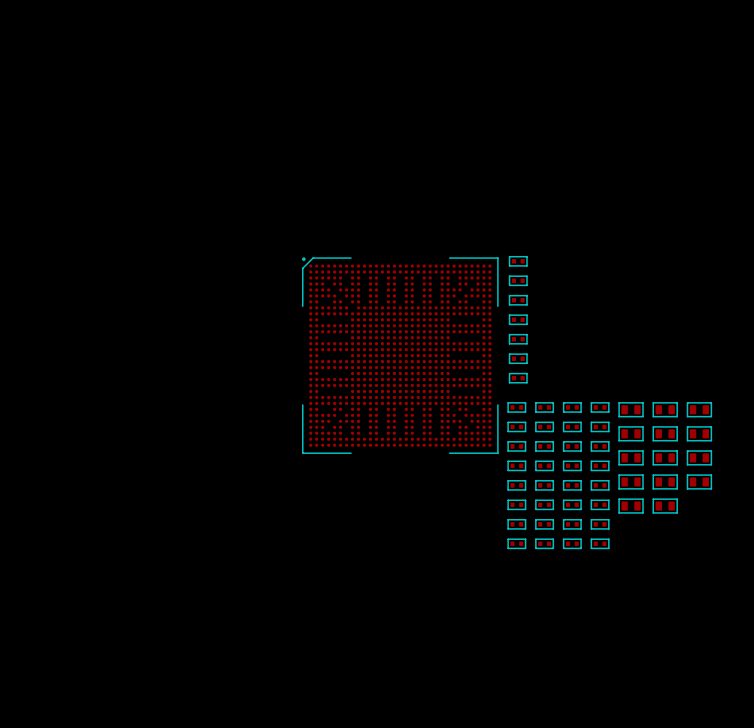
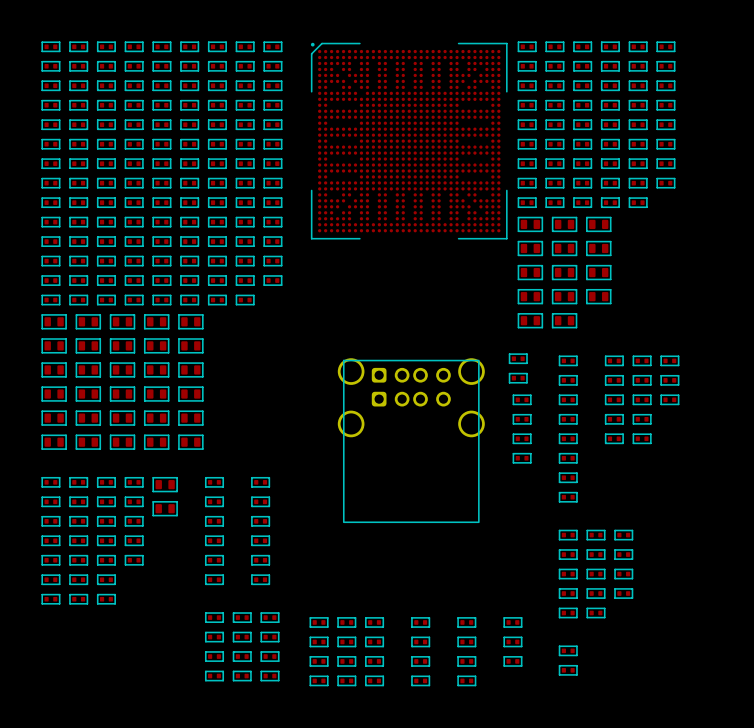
part: none -> (50, 46)
part: none -> (78, 46)
part: none -> (106, 46)
part: none -> (134, 46)
part: none -> (161, 46)
part: none -> (189, 46)
part: none -> (217, 46)
part: none -> (245, 46)
part: none -> (272, 46)
part: none -> (527, 46)
part: none -> (554, 46)
part: none -> (582, 46)
part: none -> (610, 46)
part: none -> (638, 46)
part: none -> (665, 46)
part: none -> (50, 66)
part: none -> (78, 66)
part: none -> (106, 66)
part: none -> (134, 66)
part: none -> (161, 66)
part: none -> (189, 66)
part: none -> (217, 66)
part: none -> (245, 66)
part: none -> (272, 66)
part: none -> (527, 66)
part: none -> (554, 66)
part: none -> (582, 66)
part: none -> (610, 66)
part: none -> (638, 66)
part: none -> (665, 66)
part: none -> (50, 85)
part: none -> (78, 85)
part: none -> (106, 85)
part: none -> (134, 85)
part: none -> (161, 85)
part: none -> (189, 85)
part: none -> (217, 85)
part: none -> (245, 85)
part: none -> (272, 85)
part: none -> (527, 85)
part: none -> (554, 85)
part: none -> (582, 85)
part: none -> (610, 85)
part: none -> (638, 85)
part: none -> (665, 85)
part: none -> (50, 105)
part: none -> (78, 105)
part: none -> (106, 105)
part: none -> (134, 105)
part: none -> (161, 105)
part: none -> (189, 105)
part: none -> (217, 105)
part: none -> (245, 105)
part: none -> (272, 105)
part: none -> (527, 105)
part: none -> (554, 105)
part: none -> (582, 105)
part: none -> (610, 105)
part: none -> (638, 105)
part: none -> (665, 105)
part: none -> (50, 124)
part: none -> (78, 124)
part: none -> (106, 124)
part: none -> (134, 124)
part: none -> (161, 124)
part: none -> (189, 124)
part: none -> (217, 124)
part: none -> (245, 124)
part: none -> (272, 124)
part: none -> (527, 124)
part: none -> (554, 124)
part: none -> (582, 124)
part: none -> (610, 124)
part: none -> (638, 124)
part: none -> (665, 124)
part: none -> (50, 144)
part: none -> (78, 144)
part: none -> (106, 144)
part: none -> (134, 144)
part: none -> (161, 144)
part: none -> (189, 144)
part: none -> (217, 144)
part: none -> (245, 144)
part: none -> (272, 144)
part: none -> (527, 144)
part: none -> (554, 144)
part: none -> (582, 144)
part: none -> (610, 144)
part: none -> (638, 144)
part: none -> (665, 144)
part: none -> (50, 163)
part: none -> (78, 163)
part: none -> (106, 163)
part: none -> (134, 163)
part: none -> (161, 163)
part: none -> (189, 163)
part: none -> (217, 163)
part: none -> (245, 163)
part: none -> (272, 163)
part: none -> (527, 163)
part: none -> (554, 163)
part: none -> (582, 163)
part: none -> (610, 163)
part: none -> (638, 163)
part: none -> (665, 163)
part: none -> (50, 183)
part: none -> (78, 183)
part: none -> (106, 183)
part: none -> (134, 183)
part: none -> (161, 183)
part: none -> (189, 183)
part: none -> (217, 183)
part: none -> (245, 183)
part: none -> (272, 183)
part: none -> (527, 183)
part: none -> (554, 183)
part: none -> (582, 183)
part: none -> (610, 183)
part: none -> (638, 183)
part: none -> (665, 183)
part: none -> (50, 202)
part: none -> (78, 202)
part: none -> (106, 202)
part: none -> (134, 202)
part: none -> (161, 202)
part: none -> (189, 202)
part: none -> (217, 202)
part: none -> (245, 202)
part: none -> (272, 202)
part: none -> (527, 202)
part: none -> (554, 202)
part: none -> (582, 202)
part: none -> (610, 202)
part: none -> (638, 202)
part: none -> (50, 222)
part: none -> (78, 222)
part: none -> (106, 222)
part: none -> (134, 222)
part: none -> (161, 222)
part: none -> (189, 222)
part: none -> (217, 222)
part: none -> (245, 222)
part: none -> (272, 222)
part: none -> (530, 224)
part: none -> (564, 224)
part: none -> (598, 224)
part: none -> (50, 241)
part: none -> (78, 241)
part: none -> (106, 241)
part: none -> (134, 241)
part: none -> (161, 241)
part: none -> (189, 241)
part: none -> (217, 241)
part: none -> (245, 241)
part: none -> (272, 241)
part: none -> (530, 248)
part: none -> (564, 248)
part: none -> (598, 248)
part: none -> (50, 261)
part: none -> (78, 261)
part: none -> (106, 261)
part: none -> (134, 261)
part: none -> (161, 261)
part: none -> (189, 261)
part: none -> (217, 261)
part: none -> (245, 261)
part: none -> (272, 261)
part: (518, 261) -> none
part: none -> (530, 272)
part: none -> (564, 272)
part: none -> (598, 272)
part: none -> (50, 280)
part: none -> (78, 280)
part: none -> (106, 280)
part: none -> (134, 280)
part: none -> (161, 280)
part: none -> (189, 280)
part: none -> (217, 280)
part: none -> (245, 280)
part: none -> (272, 280)
part: (518, 280) -> none
part: none -> (530, 296)
part: none -> (564, 296)
part: none -> (598, 296)
part: none -> (50, 300)
part: none -> (78, 300)
part: none -> (106, 300)
part: none -> (134, 300)
part: none -> (161, 300)
part: none -> (189, 300)
part: none -> (217, 300)
part: none -> (245, 300)
part: (518, 300) -> none
part: (518, 319) -> none
part: none -> (530, 320)
part: none -> (564, 320)
part: none -> (54, 321)
part: none -> (88, 321)
part: none -> (122, 321)
part: none -> (156, 321)
part: none -> (190, 321)
part: (518, 339) -> none
part: none -> (54, 345)
part: none -> (88, 345)
part: none -> (122, 345)
part: none -> (156, 345)
part: none -> (190, 345)
part position: (400, 355) -> (409, 141)
part: none -> (568, 360)
part: none -> (614, 360)
part: none -> (642, 360)
part: none -> (669, 360)
part: none -> (54, 369)
part: none -> (88, 369)
part: none -> (122, 369)
part: none -> (156, 369)
part: none -> (190, 369)
part: none -> (568, 380)
part: none -> (614, 380)
part: none -> (642, 380)
part: none -> (669, 380)
part: none -> (54, 394)
part: none -> (88, 394)
part: none -> (122, 394)
part: none -> (156, 394)
part: none -> (190, 394)
part: none -> (522, 399)
part: none -> (568, 399)
part: none -> (614, 399)
part: none -> (642, 399)
part: none -> (669, 399)
part: (516, 407) -> none
part: (544, 407) -> none
part: (572, 407) -> none
part: (600, 407) -> none
part: (631, 409) -> none
part: (665, 409) -> none
part: (699, 409) -> none
part: none -> (54, 418)
part: none -> (88, 418)
part: none -> (122, 418)
part: none -> (156, 418)
part: none -> (190, 418)
part: none -> (522, 419)
part: none -> (568, 419)
part: none -> (614, 419)
part: none -> (642, 419)
part: (516, 426) -> none
part: (544, 426) -> none
part: (572, 426) -> none
part: (600, 426) -> none
part: (631, 433) -> none
part: (665, 433) -> none
part: (699, 433) -> none
part: none -> (522, 438)
part: none -> (568, 438)
part: none -> (614, 438)
part: none -> (642, 438)
part: none -> (411, 440)
part: none -> (54, 442)
part: none -> (88, 442)
part: none -> (122, 442)
part: none -> (156, 442)
part: none -> (190, 442)
part: (516, 446) -> none
part: (544, 446) -> none
part: (572, 446) -> none
part: (600, 446) -> none
part: (631, 457) -> none
part: (665, 457) -> none
part: (699, 457) -> none
part: none -> (522, 458)
part: none -> (568, 458)
part: (516, 465) -> none
part: (544, 465) -> none
part: (572, 465) -> none
part: (600, 465) -> none
part: none -> (568, 477)
part: (631, 481) -> none
part: (665, 481) -> none
part: (699, 481) -> none
part: none -> (50, 482)
part: none -> (78, 482)
part: none -> (106, 482)
part: none -> (134, 482)
part: none -> (214, 482)
part: none -> (260, 482)
part: none -> (165, 484)
part: (516, 485) -> none
part: (544, 485) -> none
part: (572, 485) -> none
part: (600, 485) -> none
part: none -> (568, 497)
part: none -> (50, 501)
part: none -> (78, 501)
part: none -> (106, 501)
part: none -> (134, 501)
part: none -> (214, 501)
part: none -> (260, 501)
part: (516, 504) -> none
part: (544, 504) -> none
part: (572, 504) -> none
part: (600, 504) -> none
part: (631, 506) -> none
part: (665, 506) -> none
part: none -> (165, 508)
part: none -> (50, 521)
part: none -> (78, 521)
part: none -> (106, 521)
part: none -> (134, 521)
part: none -> (214, 521)
part: none -> (260, 521)
part: (516, 524) -> none
part: (544, 524) -> none
part: (572, 524) -> none
part: (600, 524) -> none
part: none -> (568, 535)
part: none -> (596, 535)
part: none -> (623, 535)
part: none -> (50, 540)
part: none -> (78, 540)
part: none -> (106, 540)
part: none -> (134, 540)
part: none -> (214, 540)
part: none -> (260, 540)
part: (516, 543) -> none
part: (544, 543) -> none
part: (572, 543) -> none
part: (600, 543) -> none
part: none -> (568, 554)
part: none -> (596, 554)
part: none -> (623, 554)
part: none -> (50, 560)
part: none -> (78, 560)
part: none -> (106, 560)
part: none -> (134, 560)
part: none -> (214, 560)
part: none -> (260, 560)
part: none -> (568, 574)
part: none -> (596, 574)
part: none -> (623, 574)
part: none -> (50, 579)
part: none -> (78, 579)
part: none -> (106, 579)
part: none -> (214, 579)
part: none -> (260, 579)
part: none -> (568, 593)
part: none -> (596, 593)
part: none -> (623, 593)
part: none -> (50, 599)
part: none -> (78, 599)
part: none -> (106, 599)
part: none -> (568, 613)
part: none -> (596, 613)
part: none -> (214, 617)
part: none -> (242, 617)
part: none -> (269, 617)
part: none -> (319, 622)
part: none -> (346, 622)
part: none -> (374, 622)
part: none -> (420, 622)
part: none -> (466, 622)
part: none -> (512, 622)
part: none -> (214, 637)
part: none -> (242, 637)
part: none -> (269, 637)
part: none -> (319, 641)
part: none -> (346, 641)
part: none -> (374, 641)
part: none -> (420, 641)
part: none -> (466, 641)
part: none -> (512, 641)
part: none -> (568, 650)
part: none -> (214, 656)
part: none -> (242, 656)
part: none -> (269, 656)
part: none -> (319, 661)
part: none -> (346, 661)
part: none -> (374, 661)
part: none -> (420, 661)
part: none -> (466, 661)
part: none -> (512, 661)
part: none -> (568, 670)
part: none -> (214, 676)
part: none -> (242, 676)
part: none -> (269, 676)
part: none -> (319, 680)
part: none -> (346, 680)
part: none -> (374, 680)
part: none -> (420, 680)
part: none -> (466, 680)

